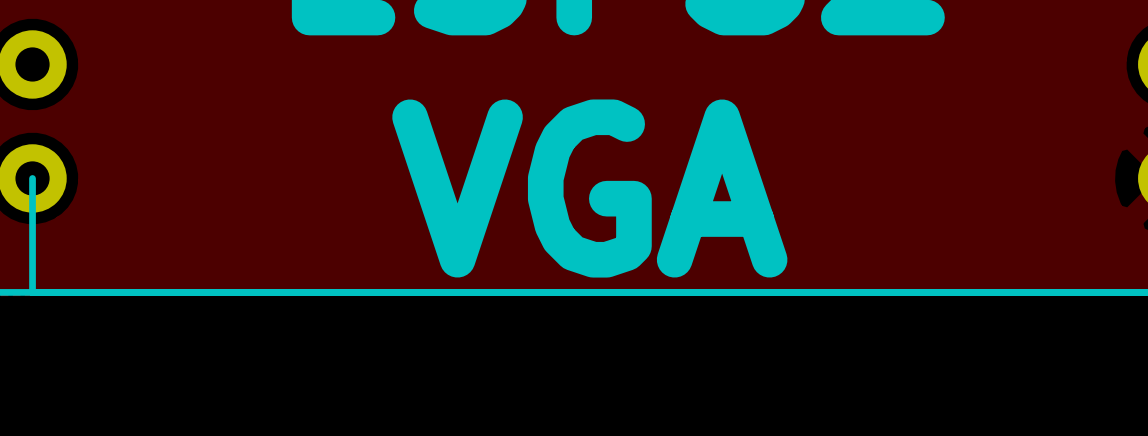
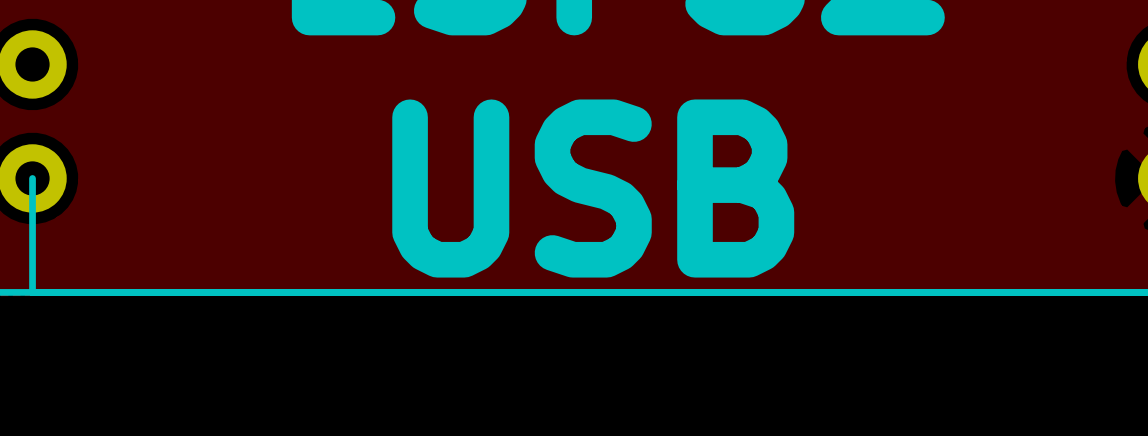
text: VGA (589, 188) -> USB (593, 188)

